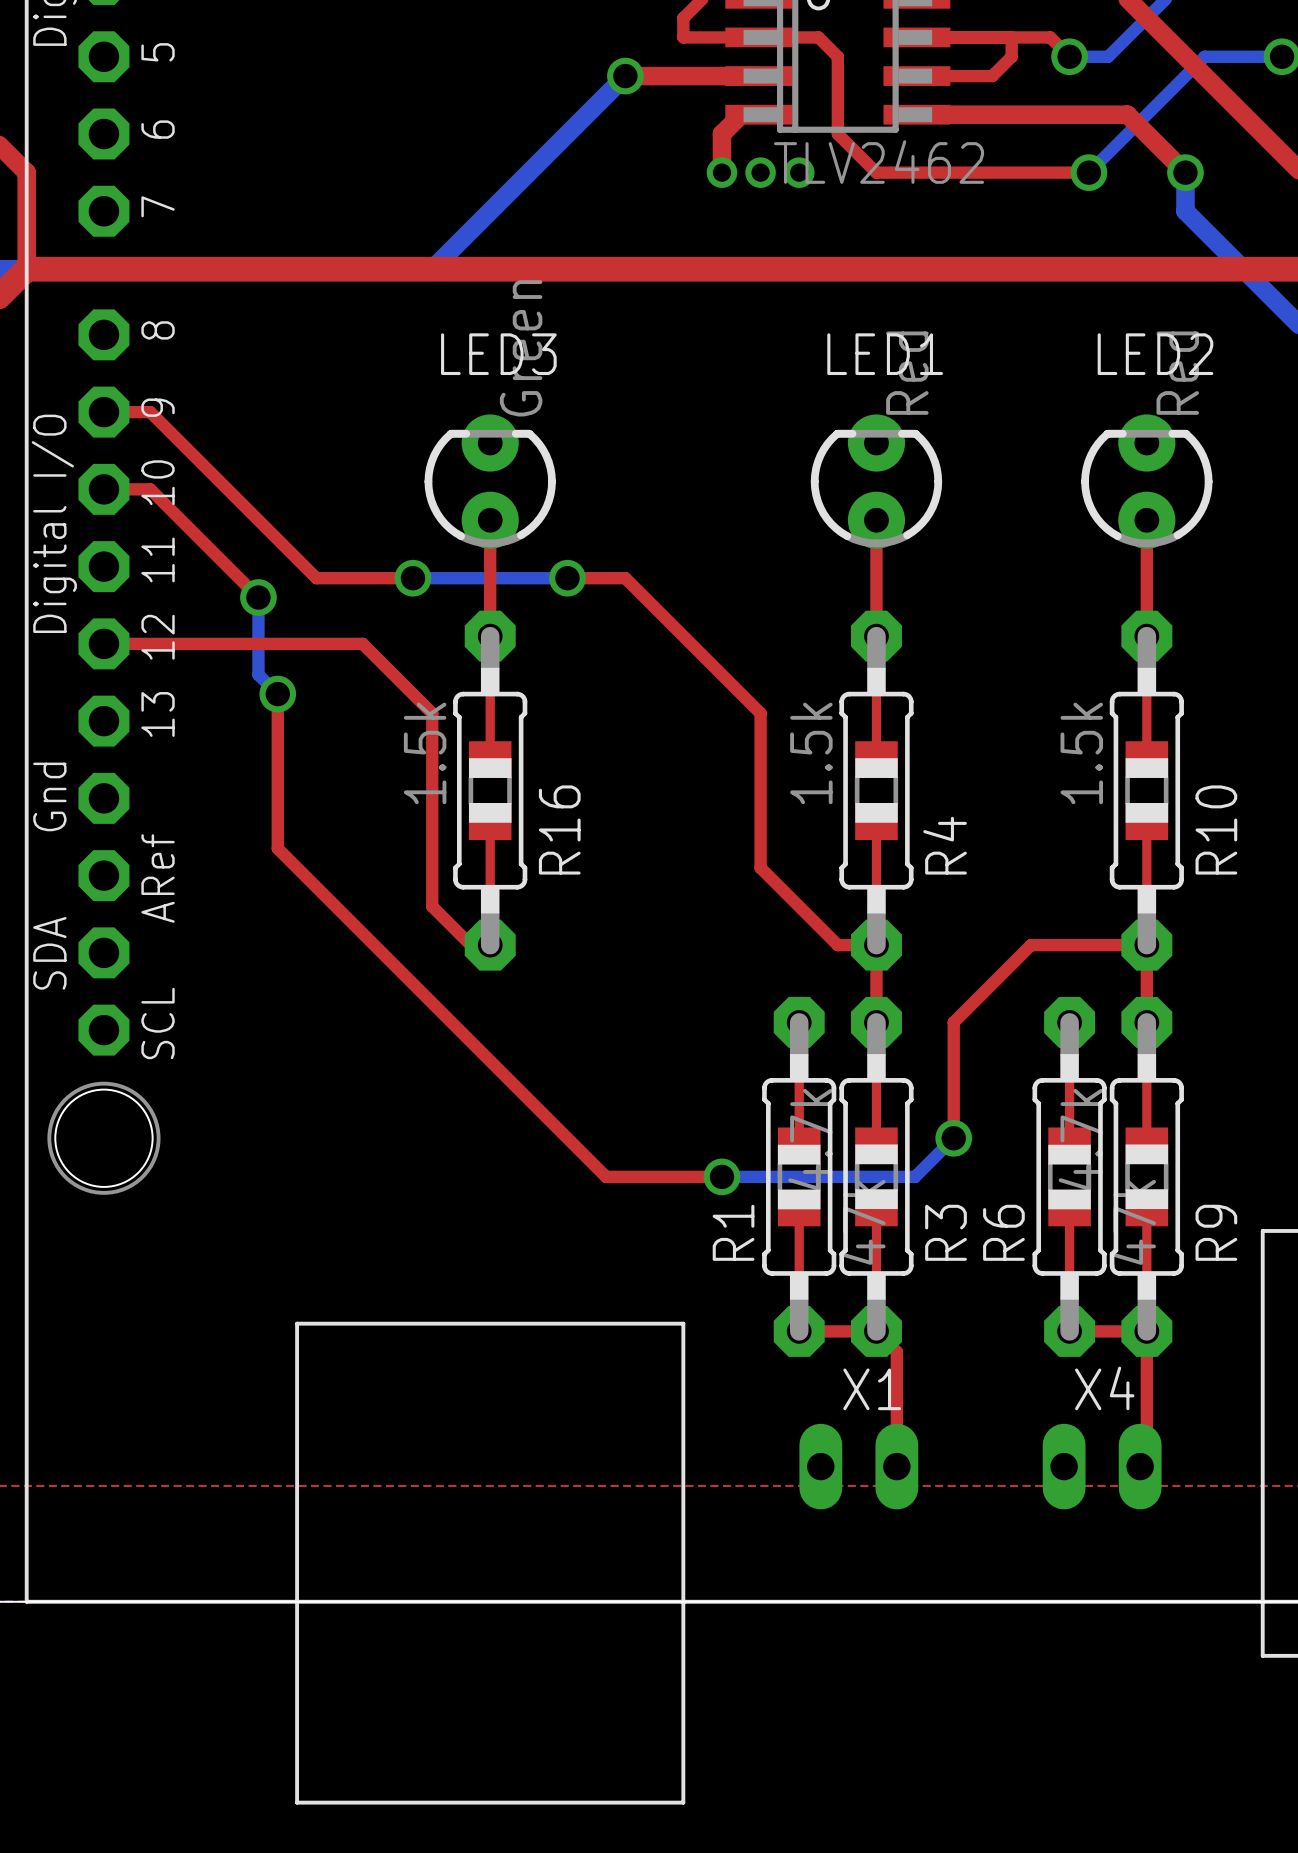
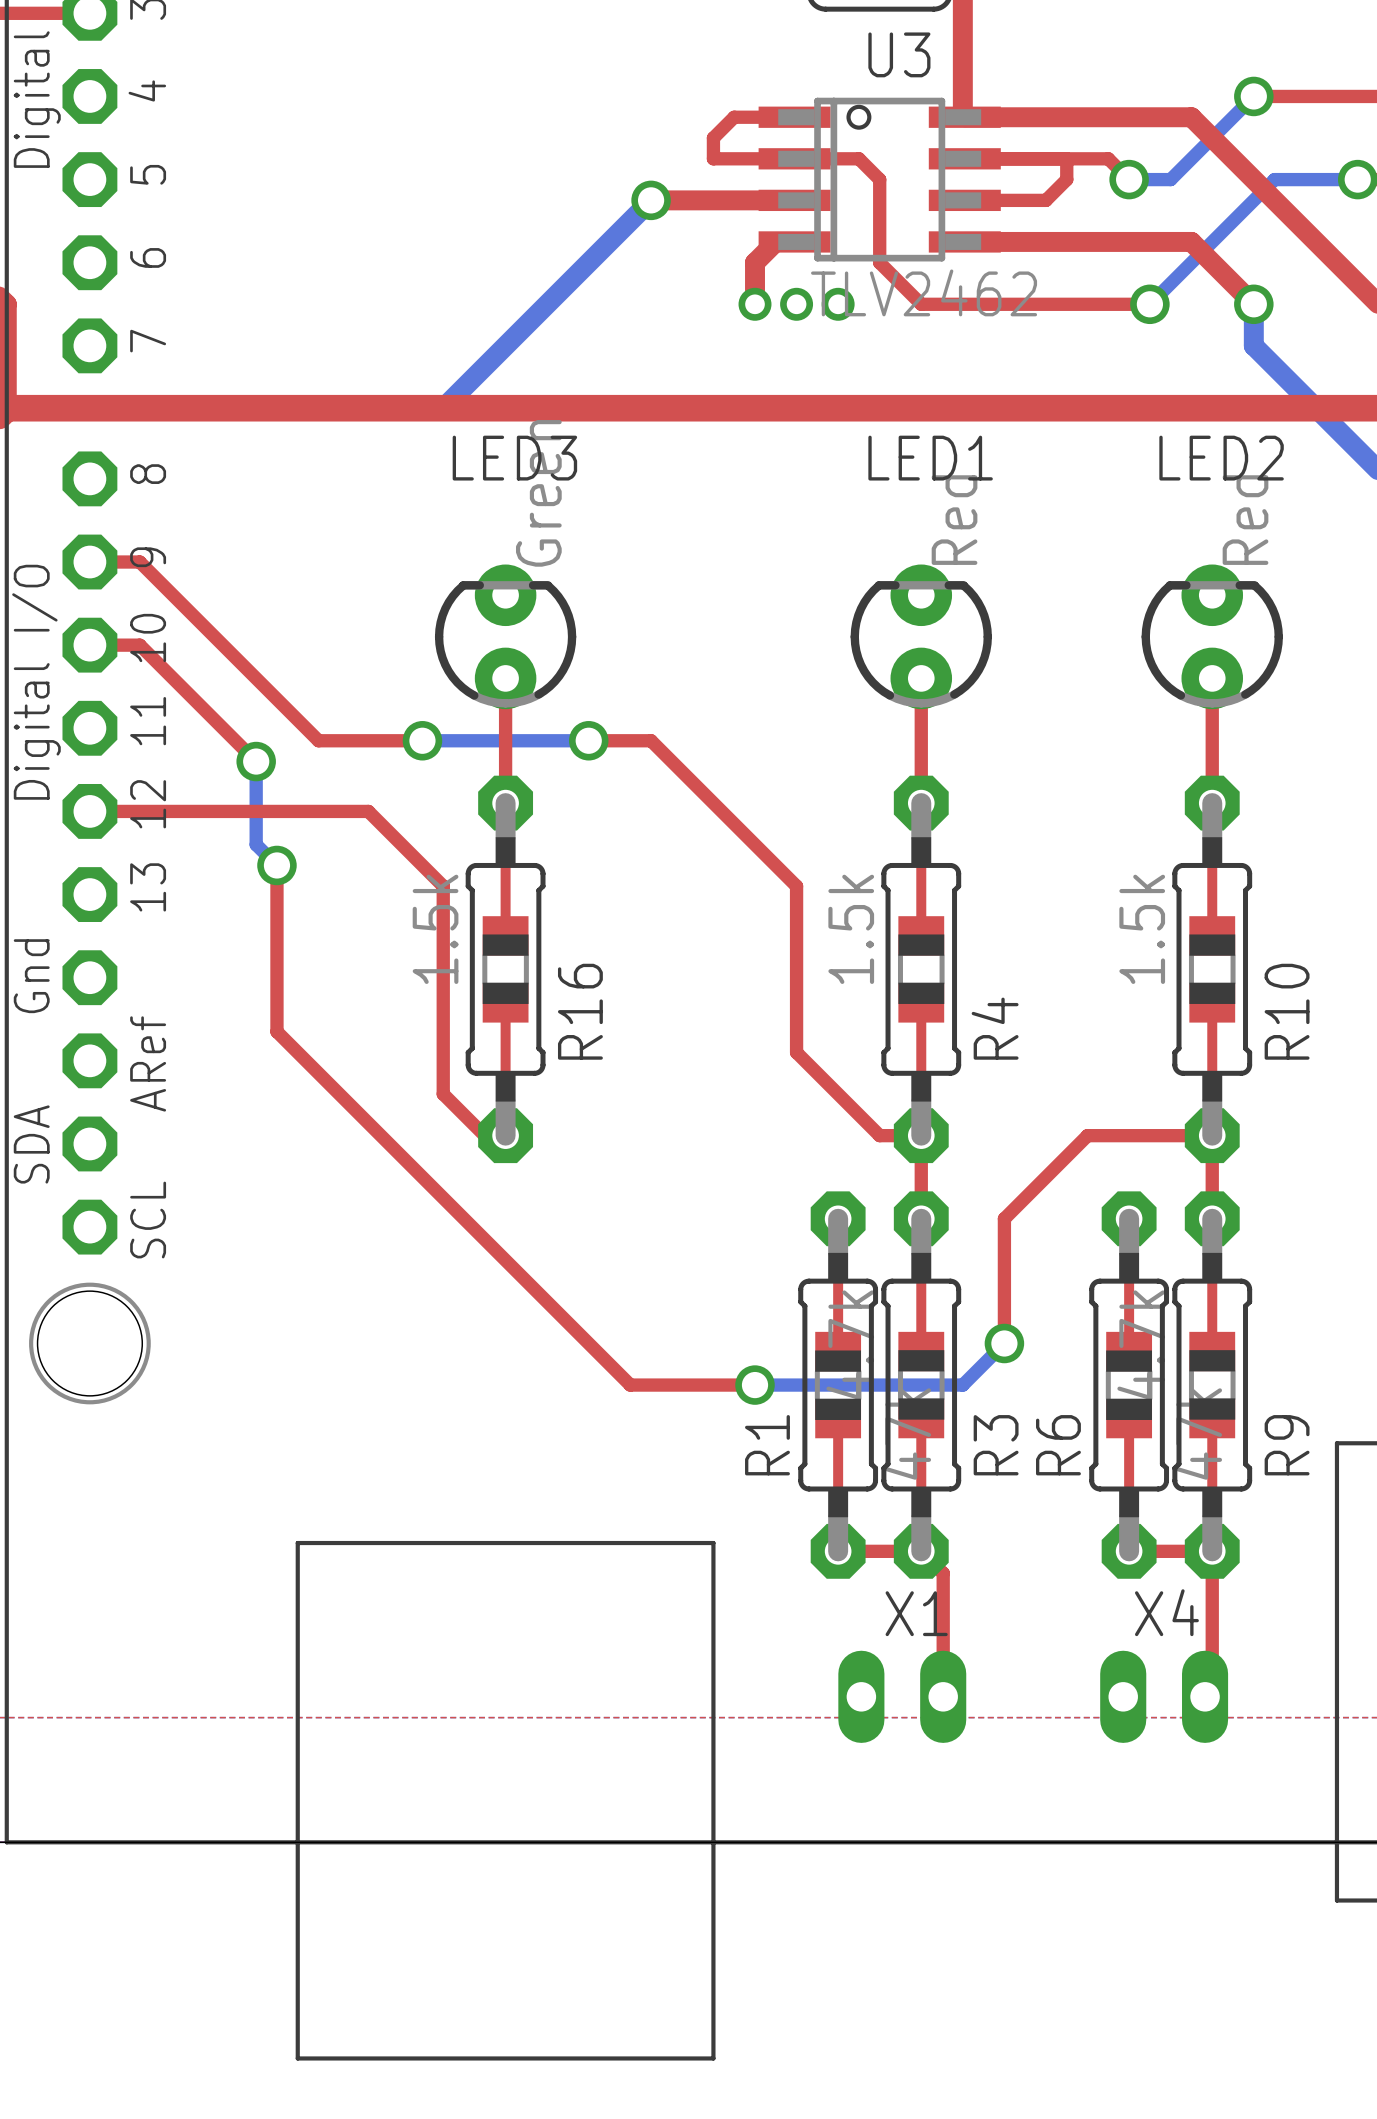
LED3 name position: LED3 (498, 354) -> LED3 (514, 458)
LED1 name position: LED1 (885, 354) -> LED1 (930, 458)
LED2 name position: LED2 (1155, 354) -> LED2 (1221, 458)

